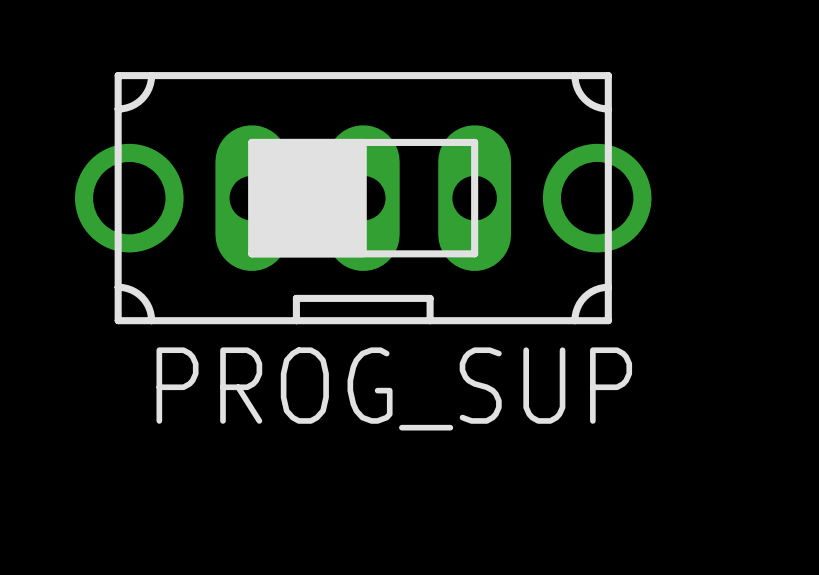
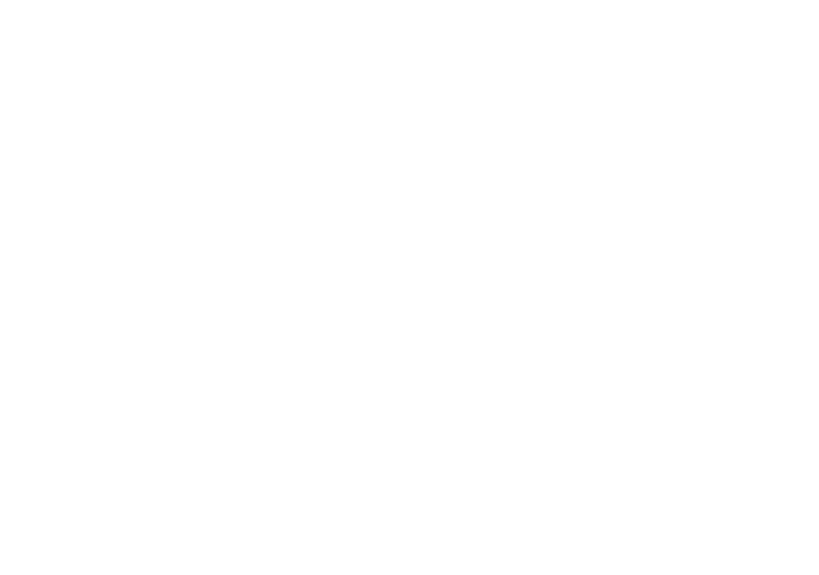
PROG_SUP: (363, 198) -> none

